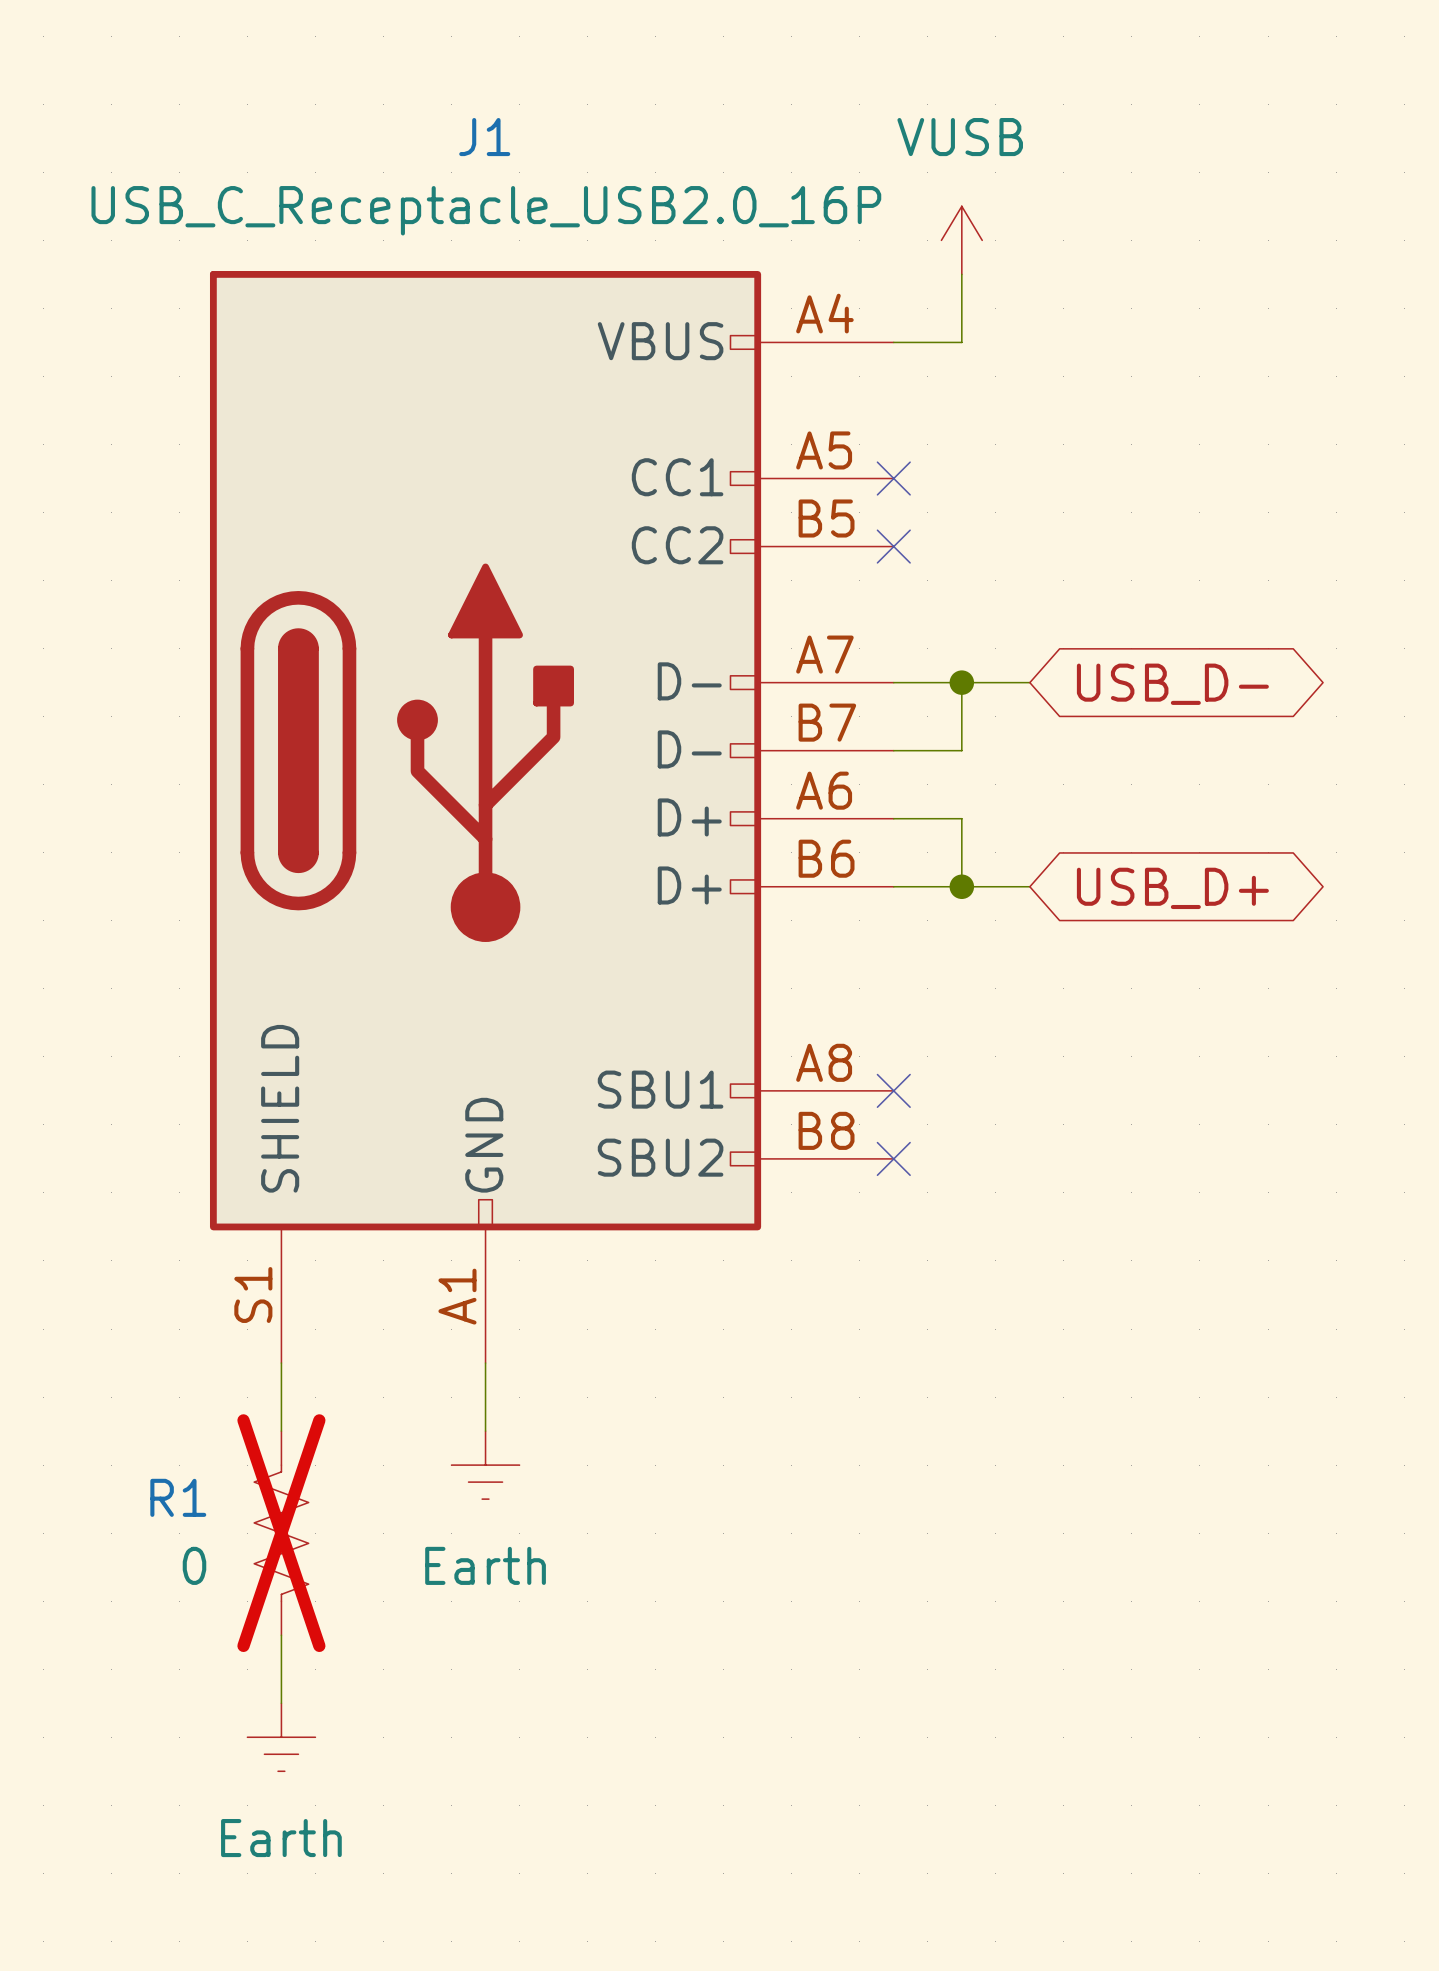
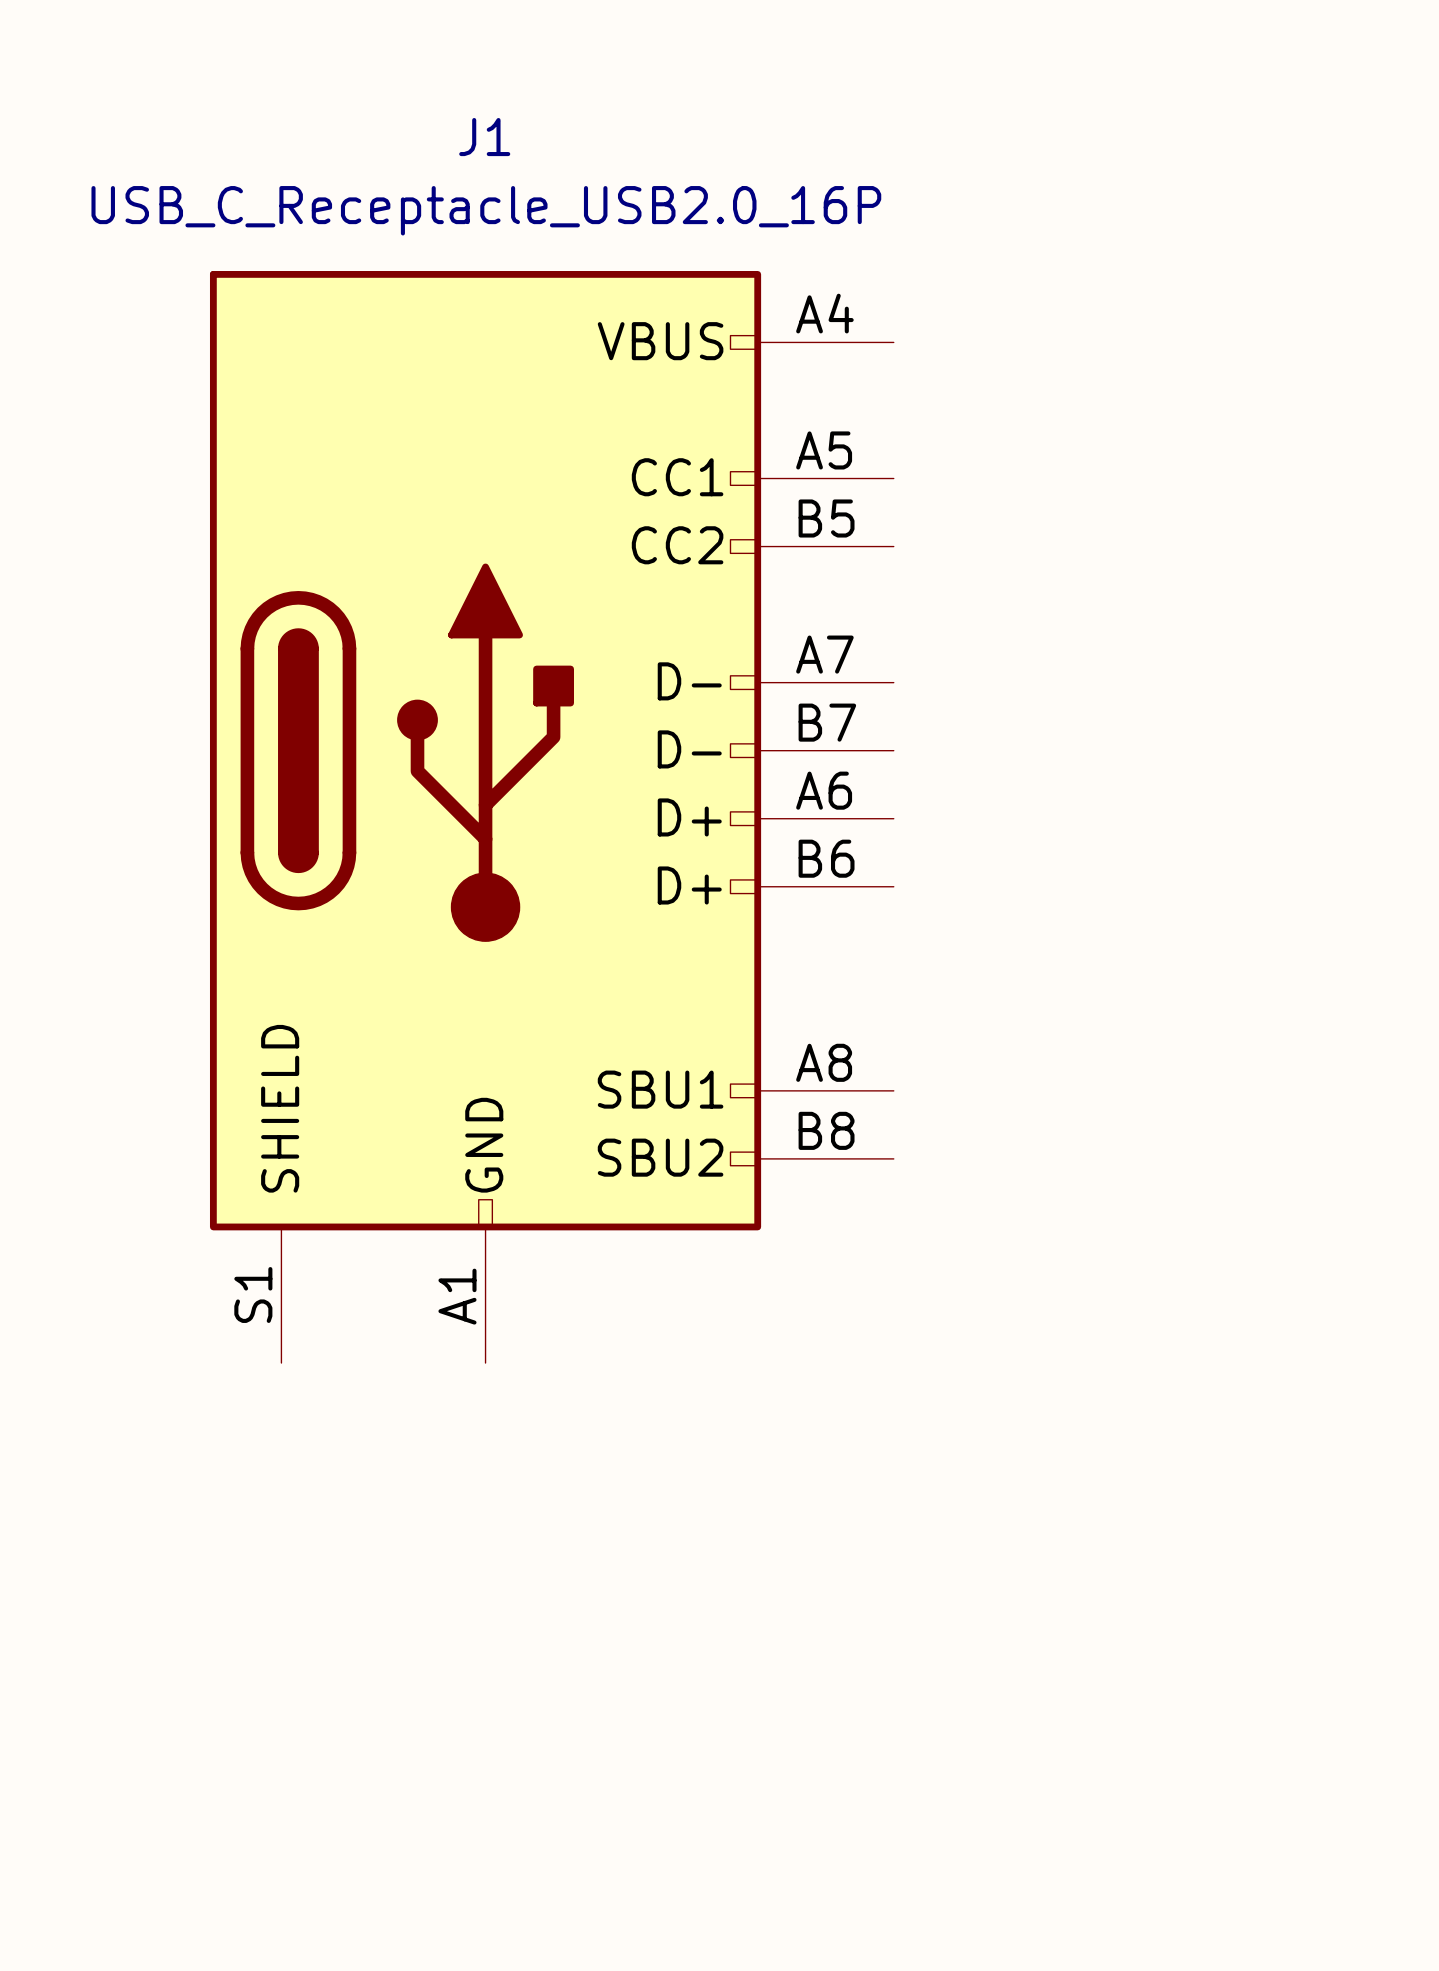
power symbol: VUSB (961, 240) -> none
wire: (961, 274) (961, 342) (893, 342) -> none
no-connect mark: (893, 478) -> none
no-connect mark: (893, 546) -> none
wire: (893, 682) (1029, 682) -> none
wire: (961, 682) (961, 750) (893, 750) -> none
junction: (961, 682) -> none
global label: USB_D- (1172, 684) -> none
wire: (893, 818) (961, 818) (961, 886) -> none
wire: (893, 886) (1029, 886) -> none
junction: (961, 886) -> none
global label: USB_D+ (1172, 888) -> none
no-connect mark: (893, 1090) -> none
no-connect mark: (893, 1158) -> none
wire: (281, 1363) (281, 1431) -> none
wire: (485, 1363) (485, 1431) -> none
power symbol: Earth (485, 1465) -> none
R1: 0 (281, 1533) -> none
wire: (281, 1635) (281, 1703) -> none
power symbol: Earth (281, 1737) -> none

